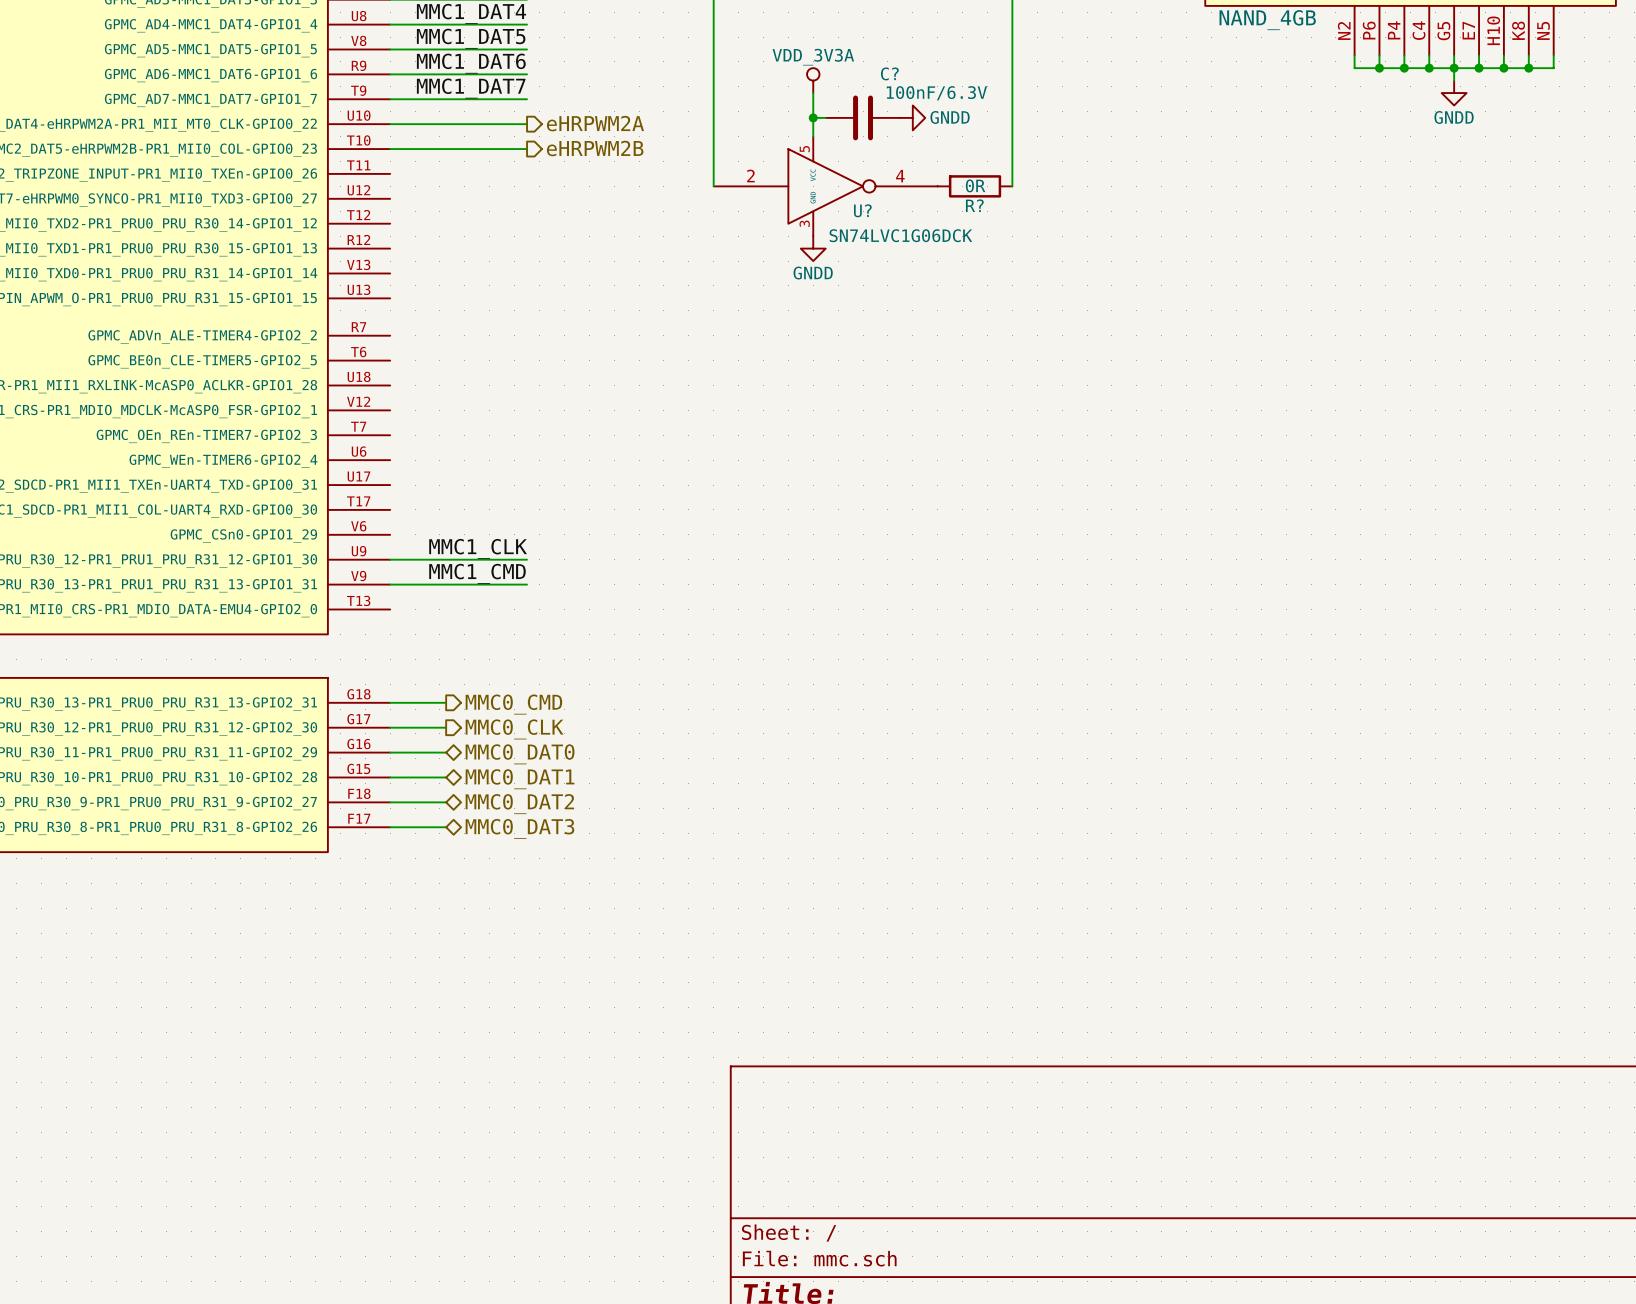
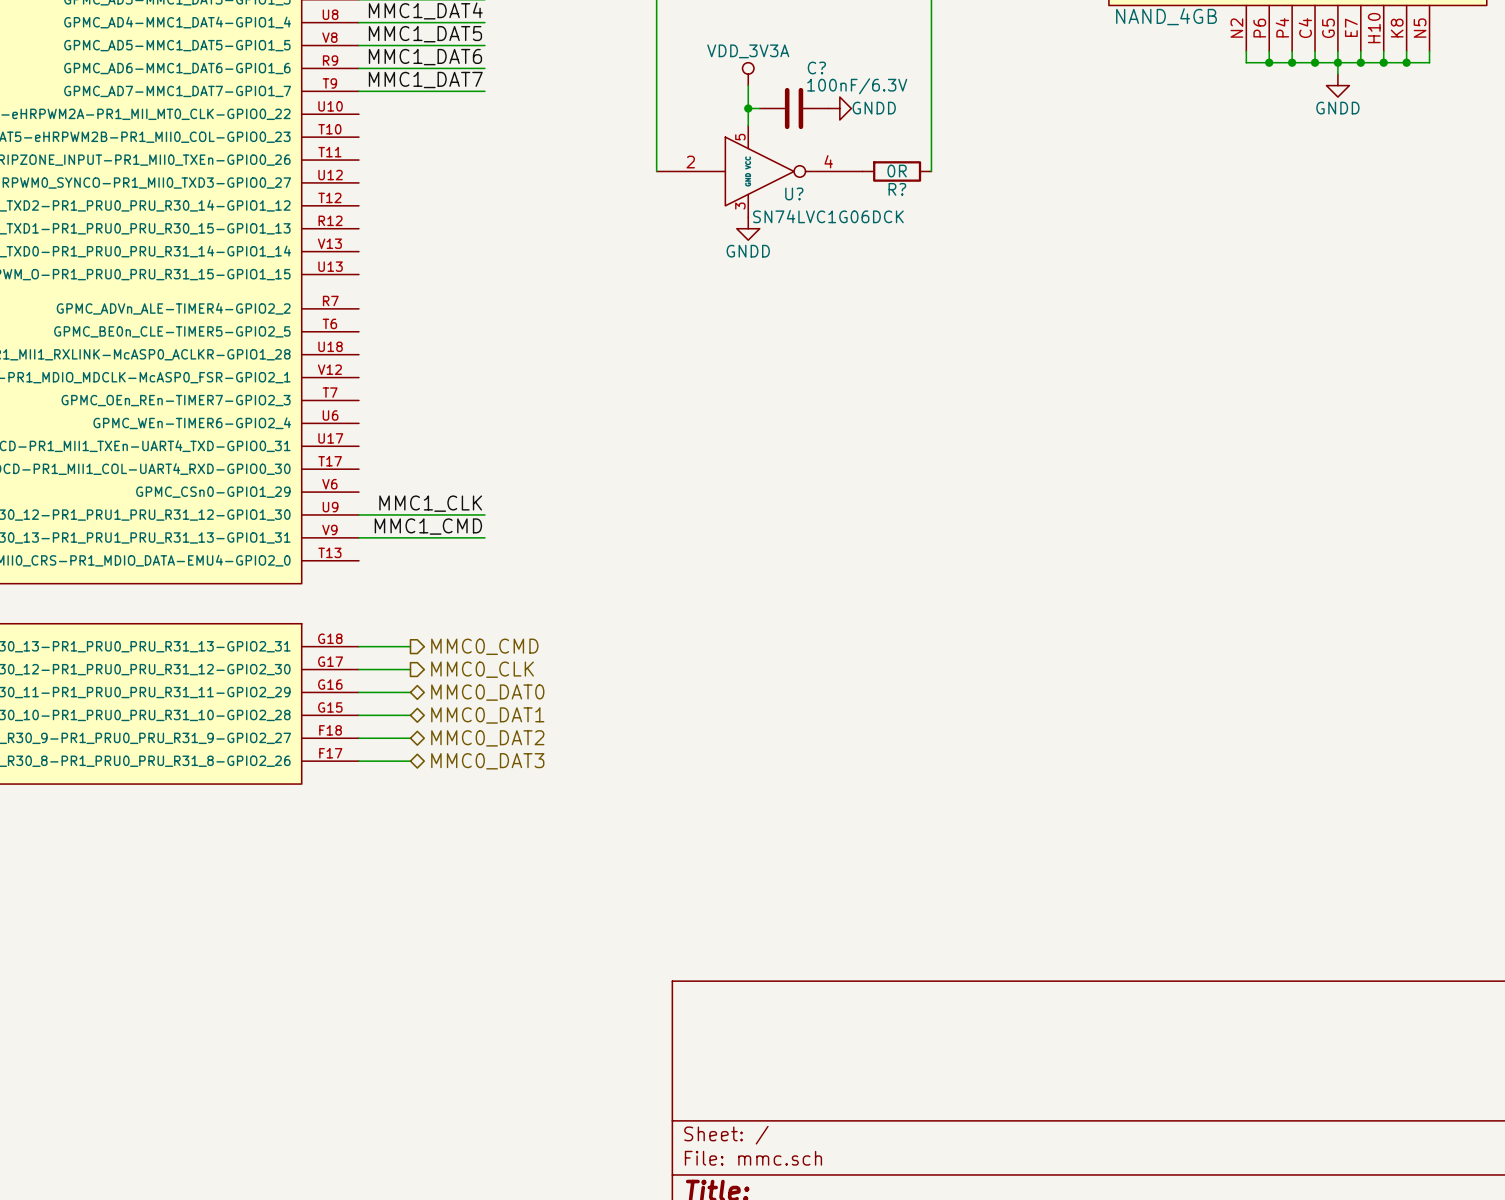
hierarchical label: eHRPWM2A (595, 123) -> none
wire: (390, 124) (527, 124) -> none
hierarchical label: eHRPWM2B (595, 148) -> none
wire: (390, 149) (527, 149) -> none

